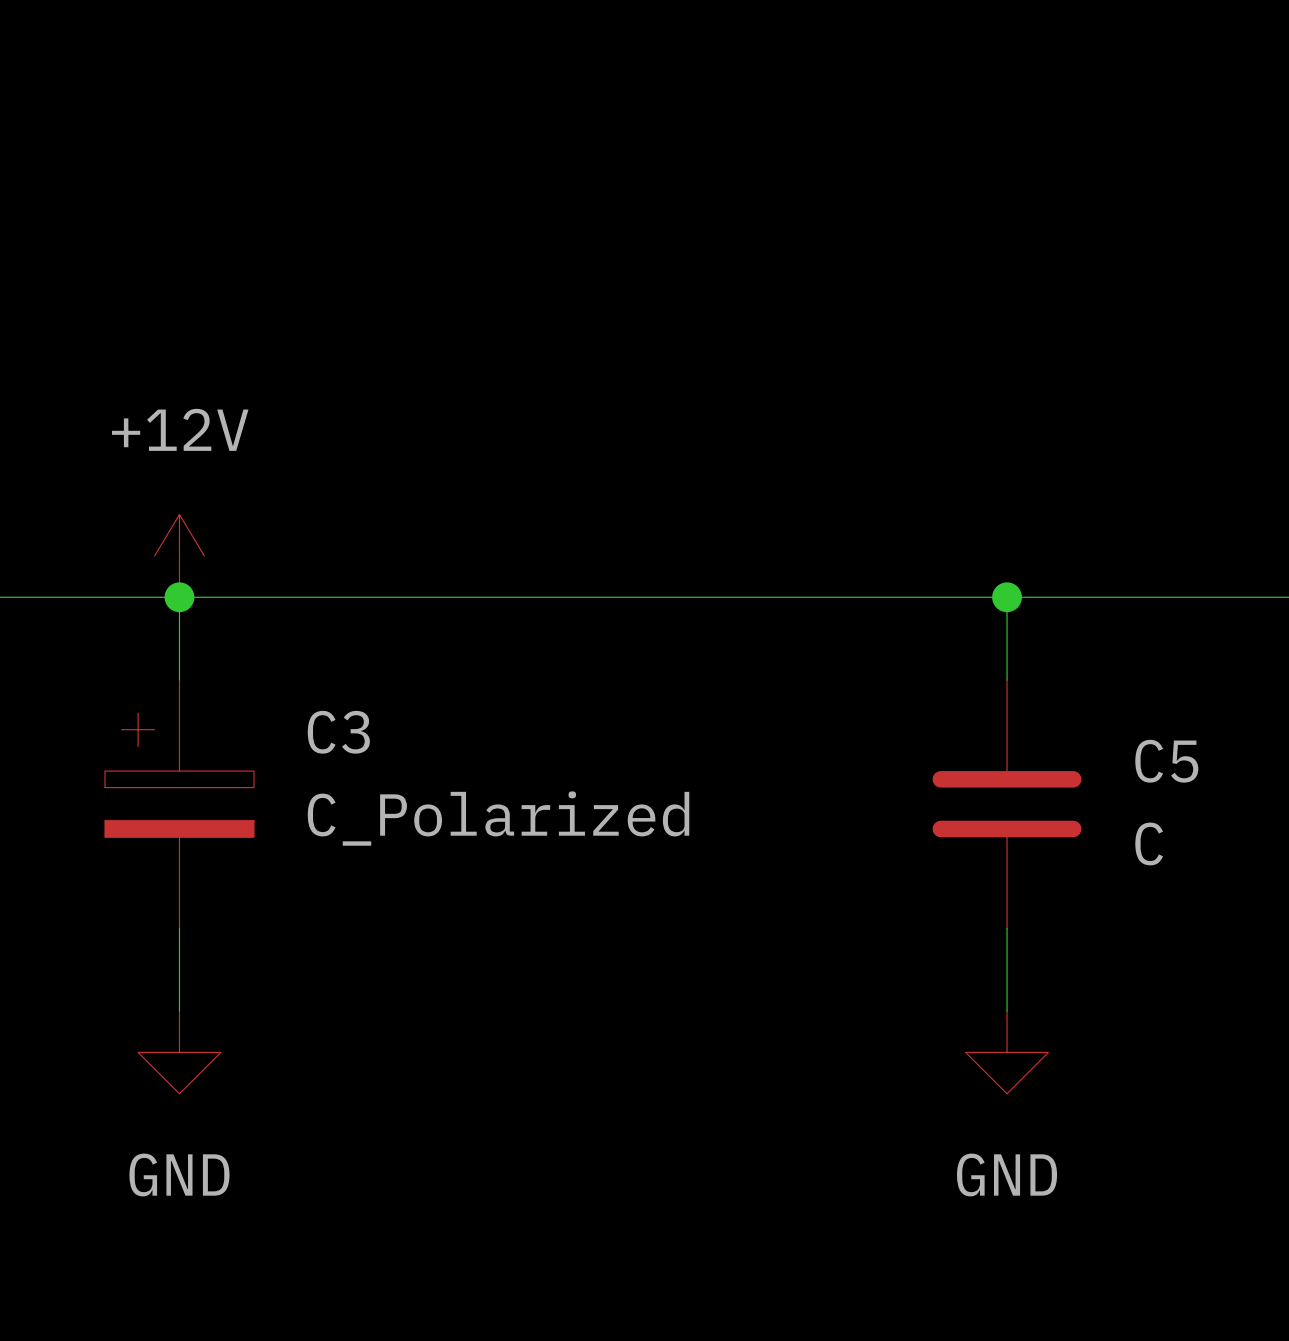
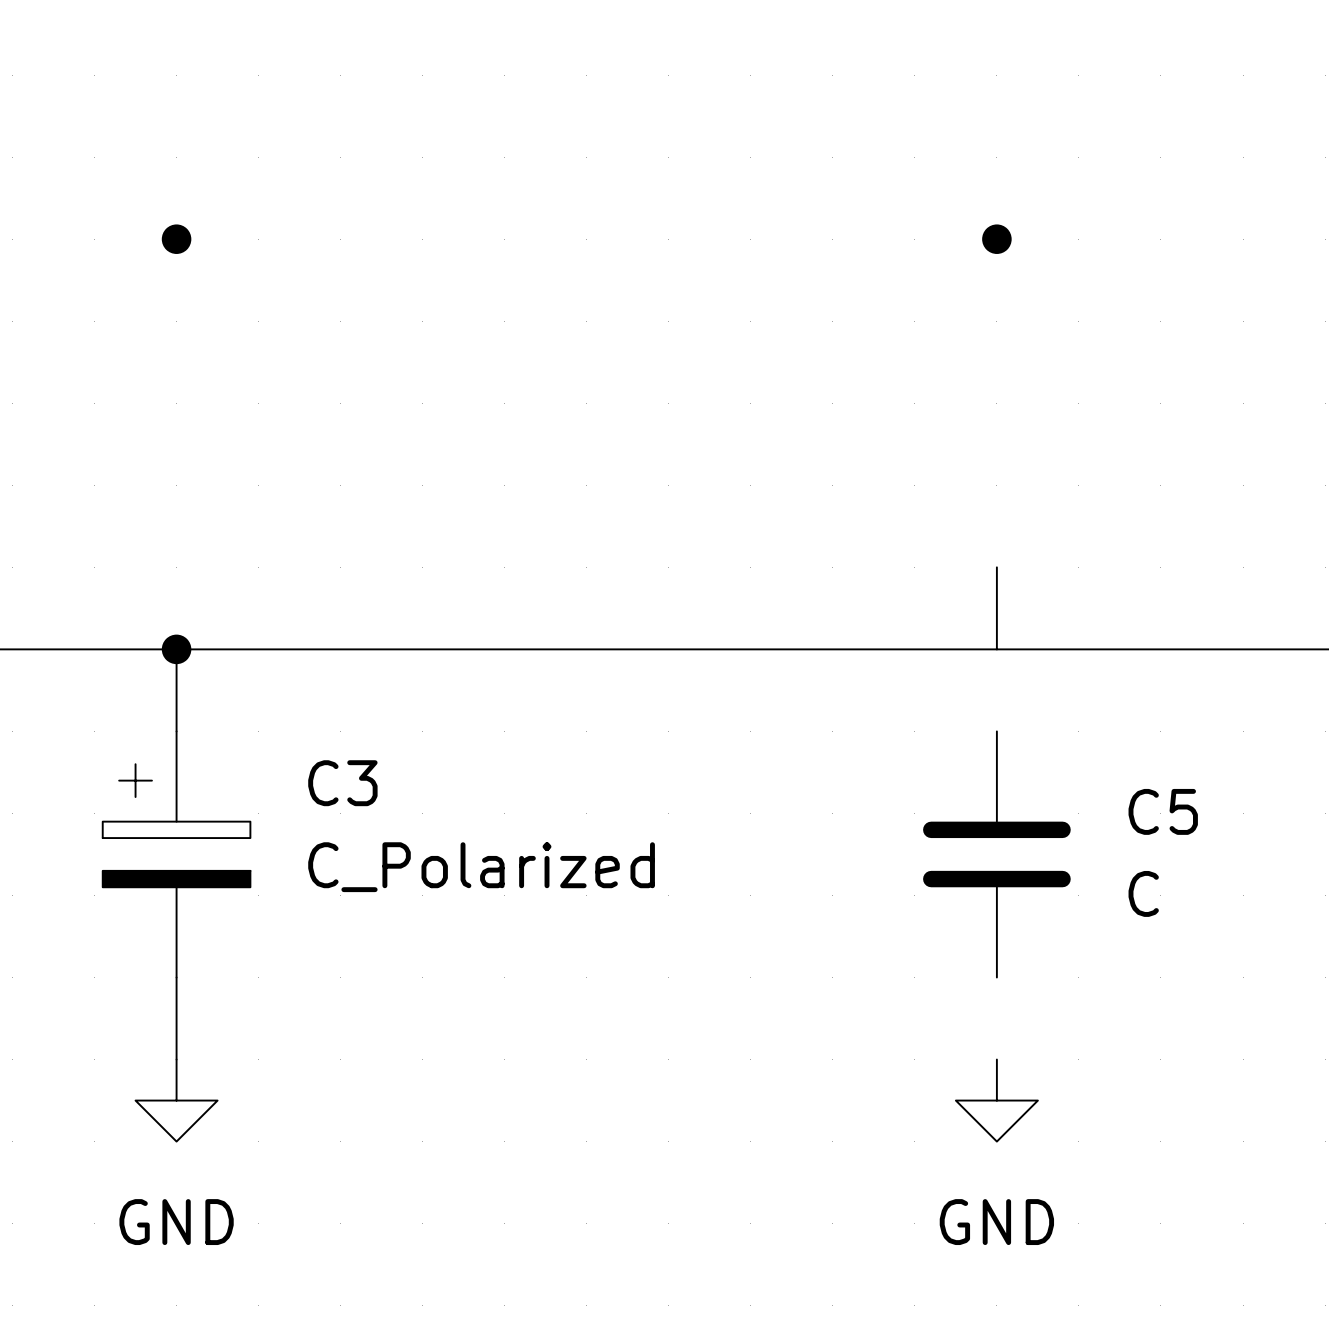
junction: none -> (176, 239)
junction: none -> (996, 239)
power symbol: +12V (179, 555) -> none
wire: (1007, 597) (1007, 680) -> (996, 649) (996, 567)
junction: (1007, 597) -> none
wire: (1007, 928) (1007, 1011) -> none

